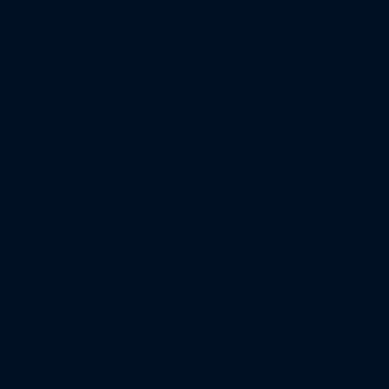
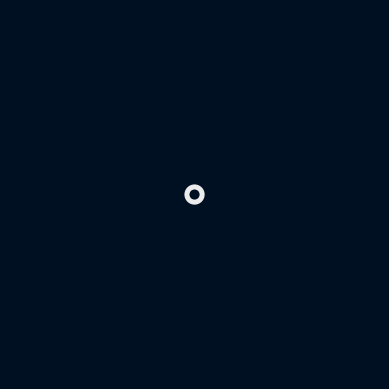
via: none -> (194, 194)

